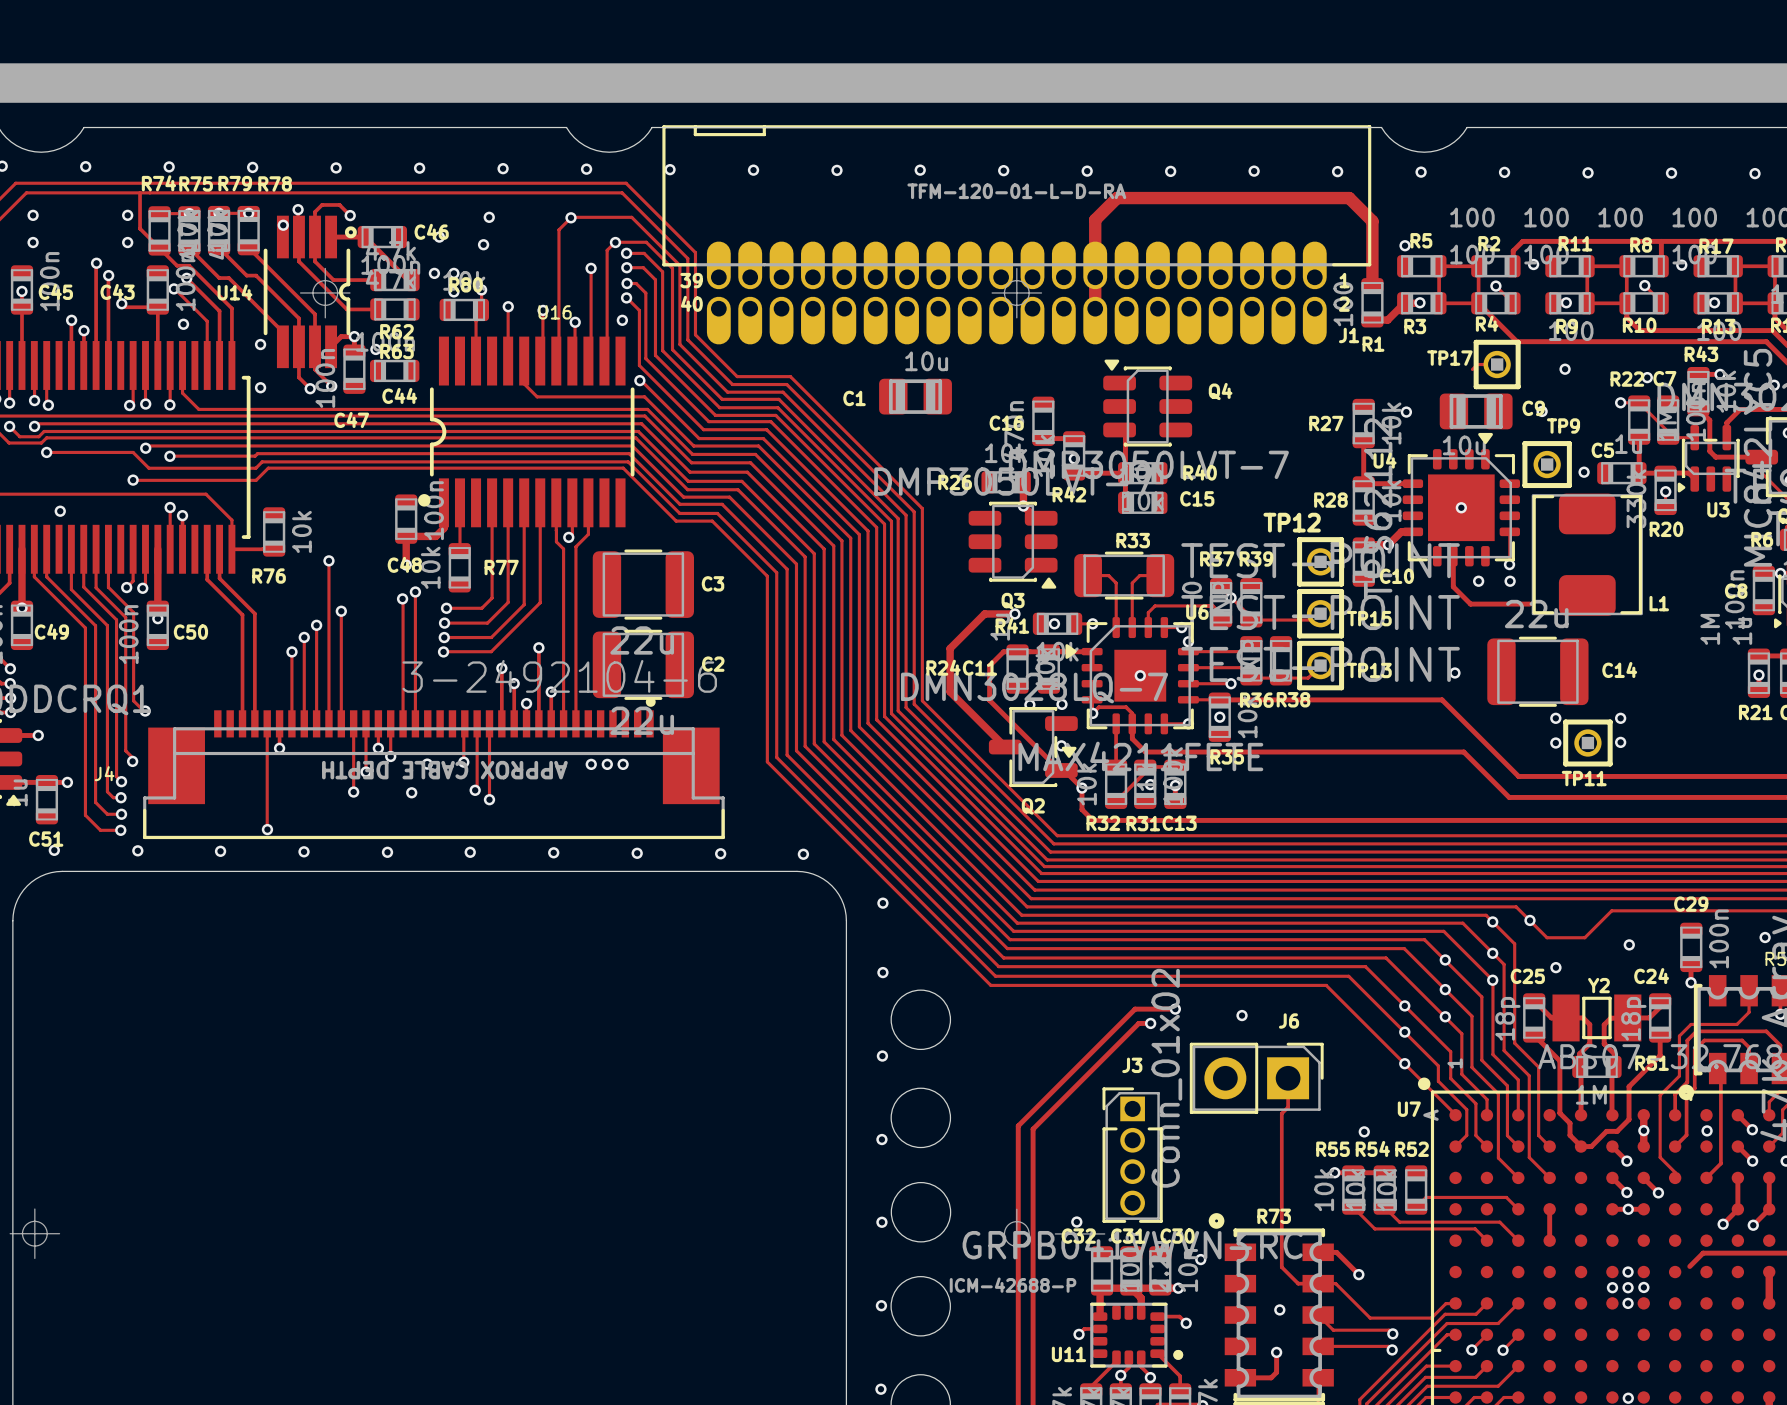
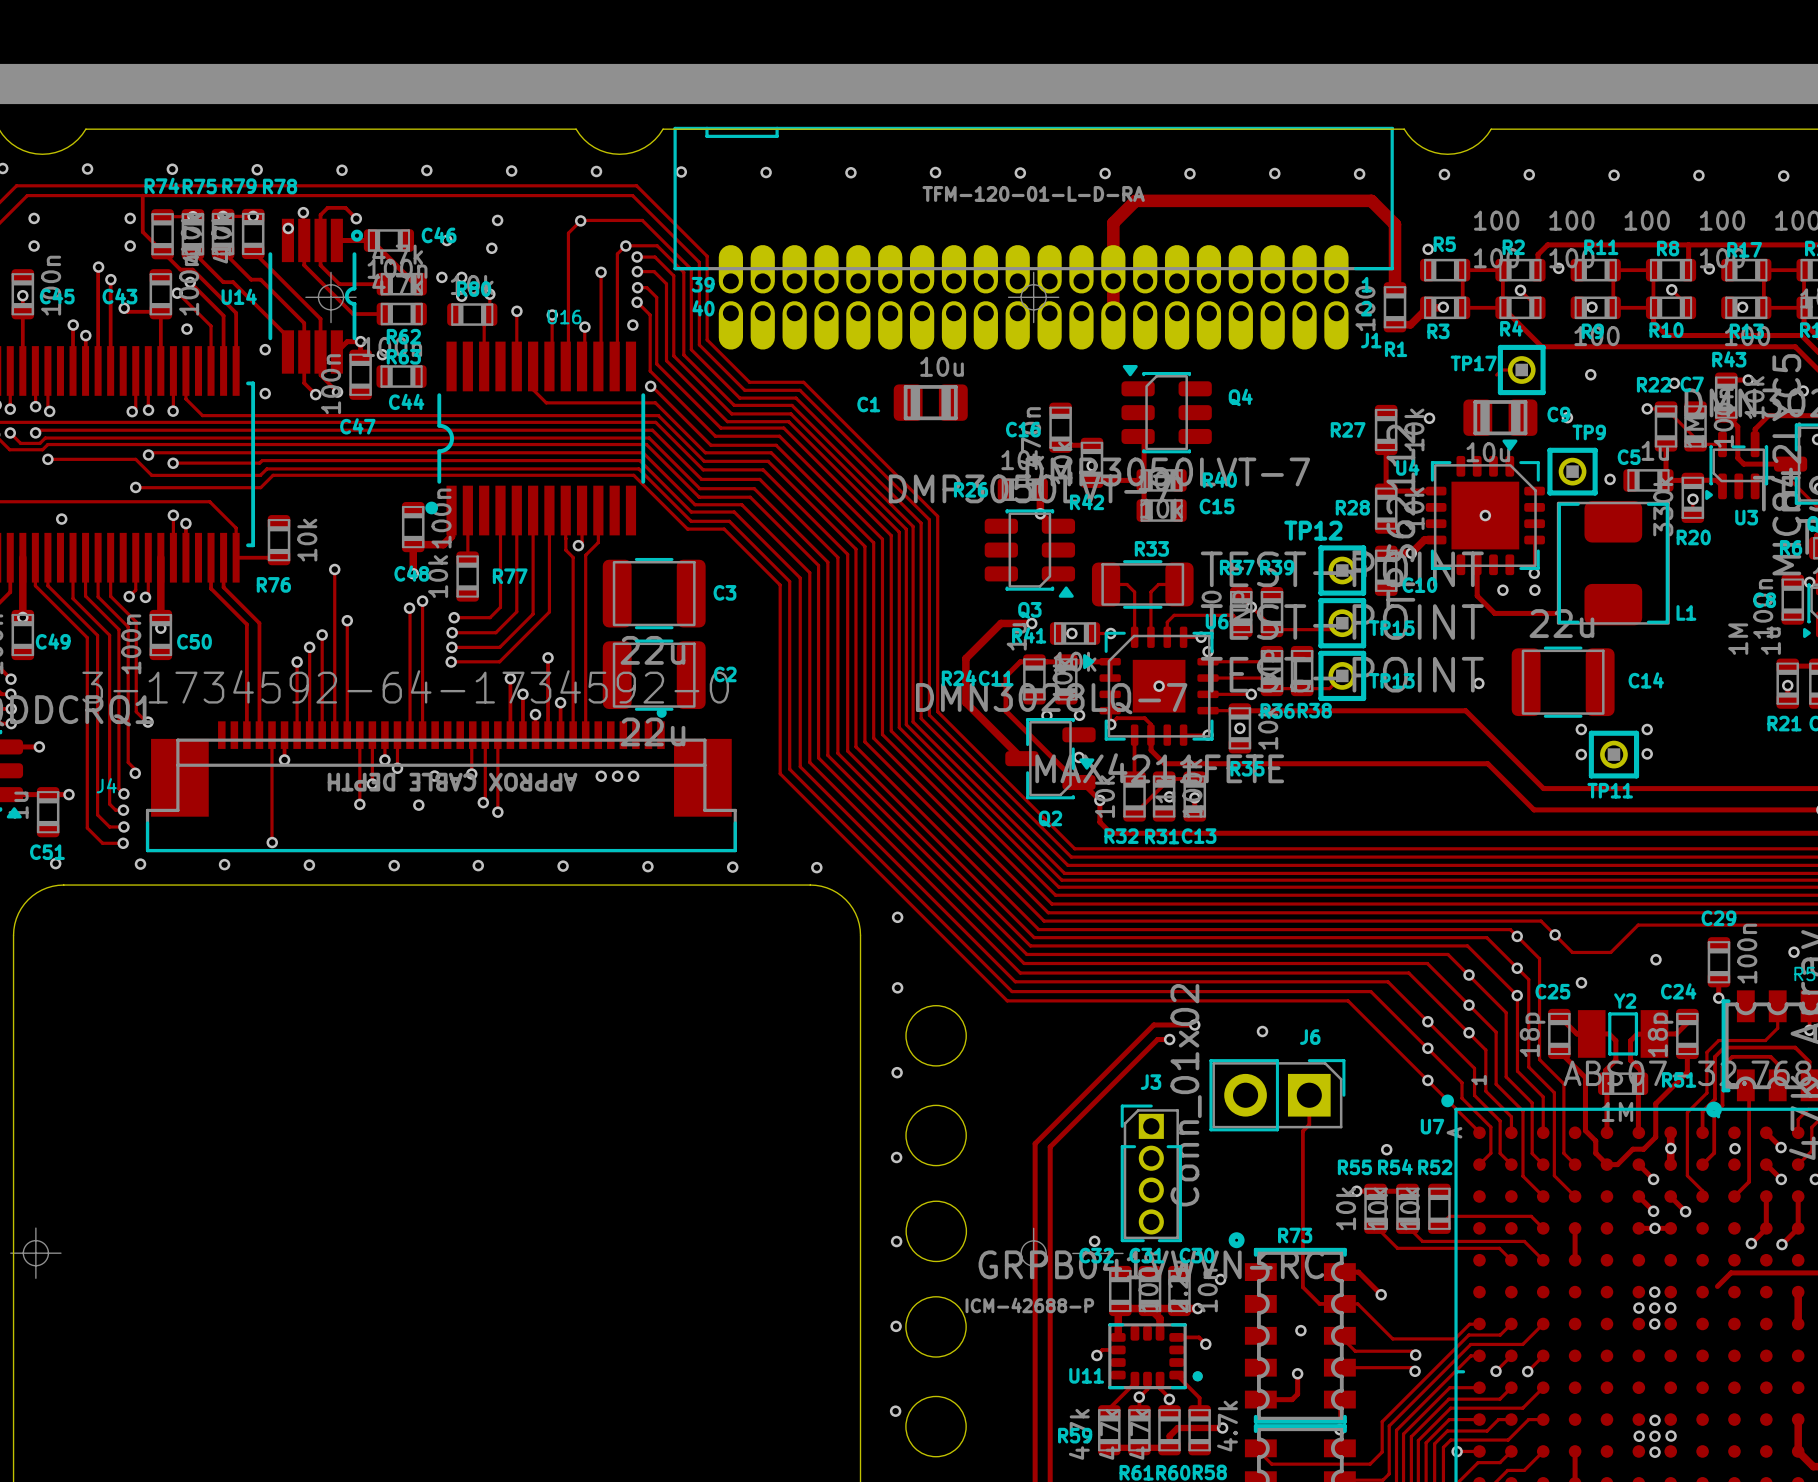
J4 value: 3-2492104-6 (559, 676) -> 3-1734592-64-1734592-0 (405, 686)

